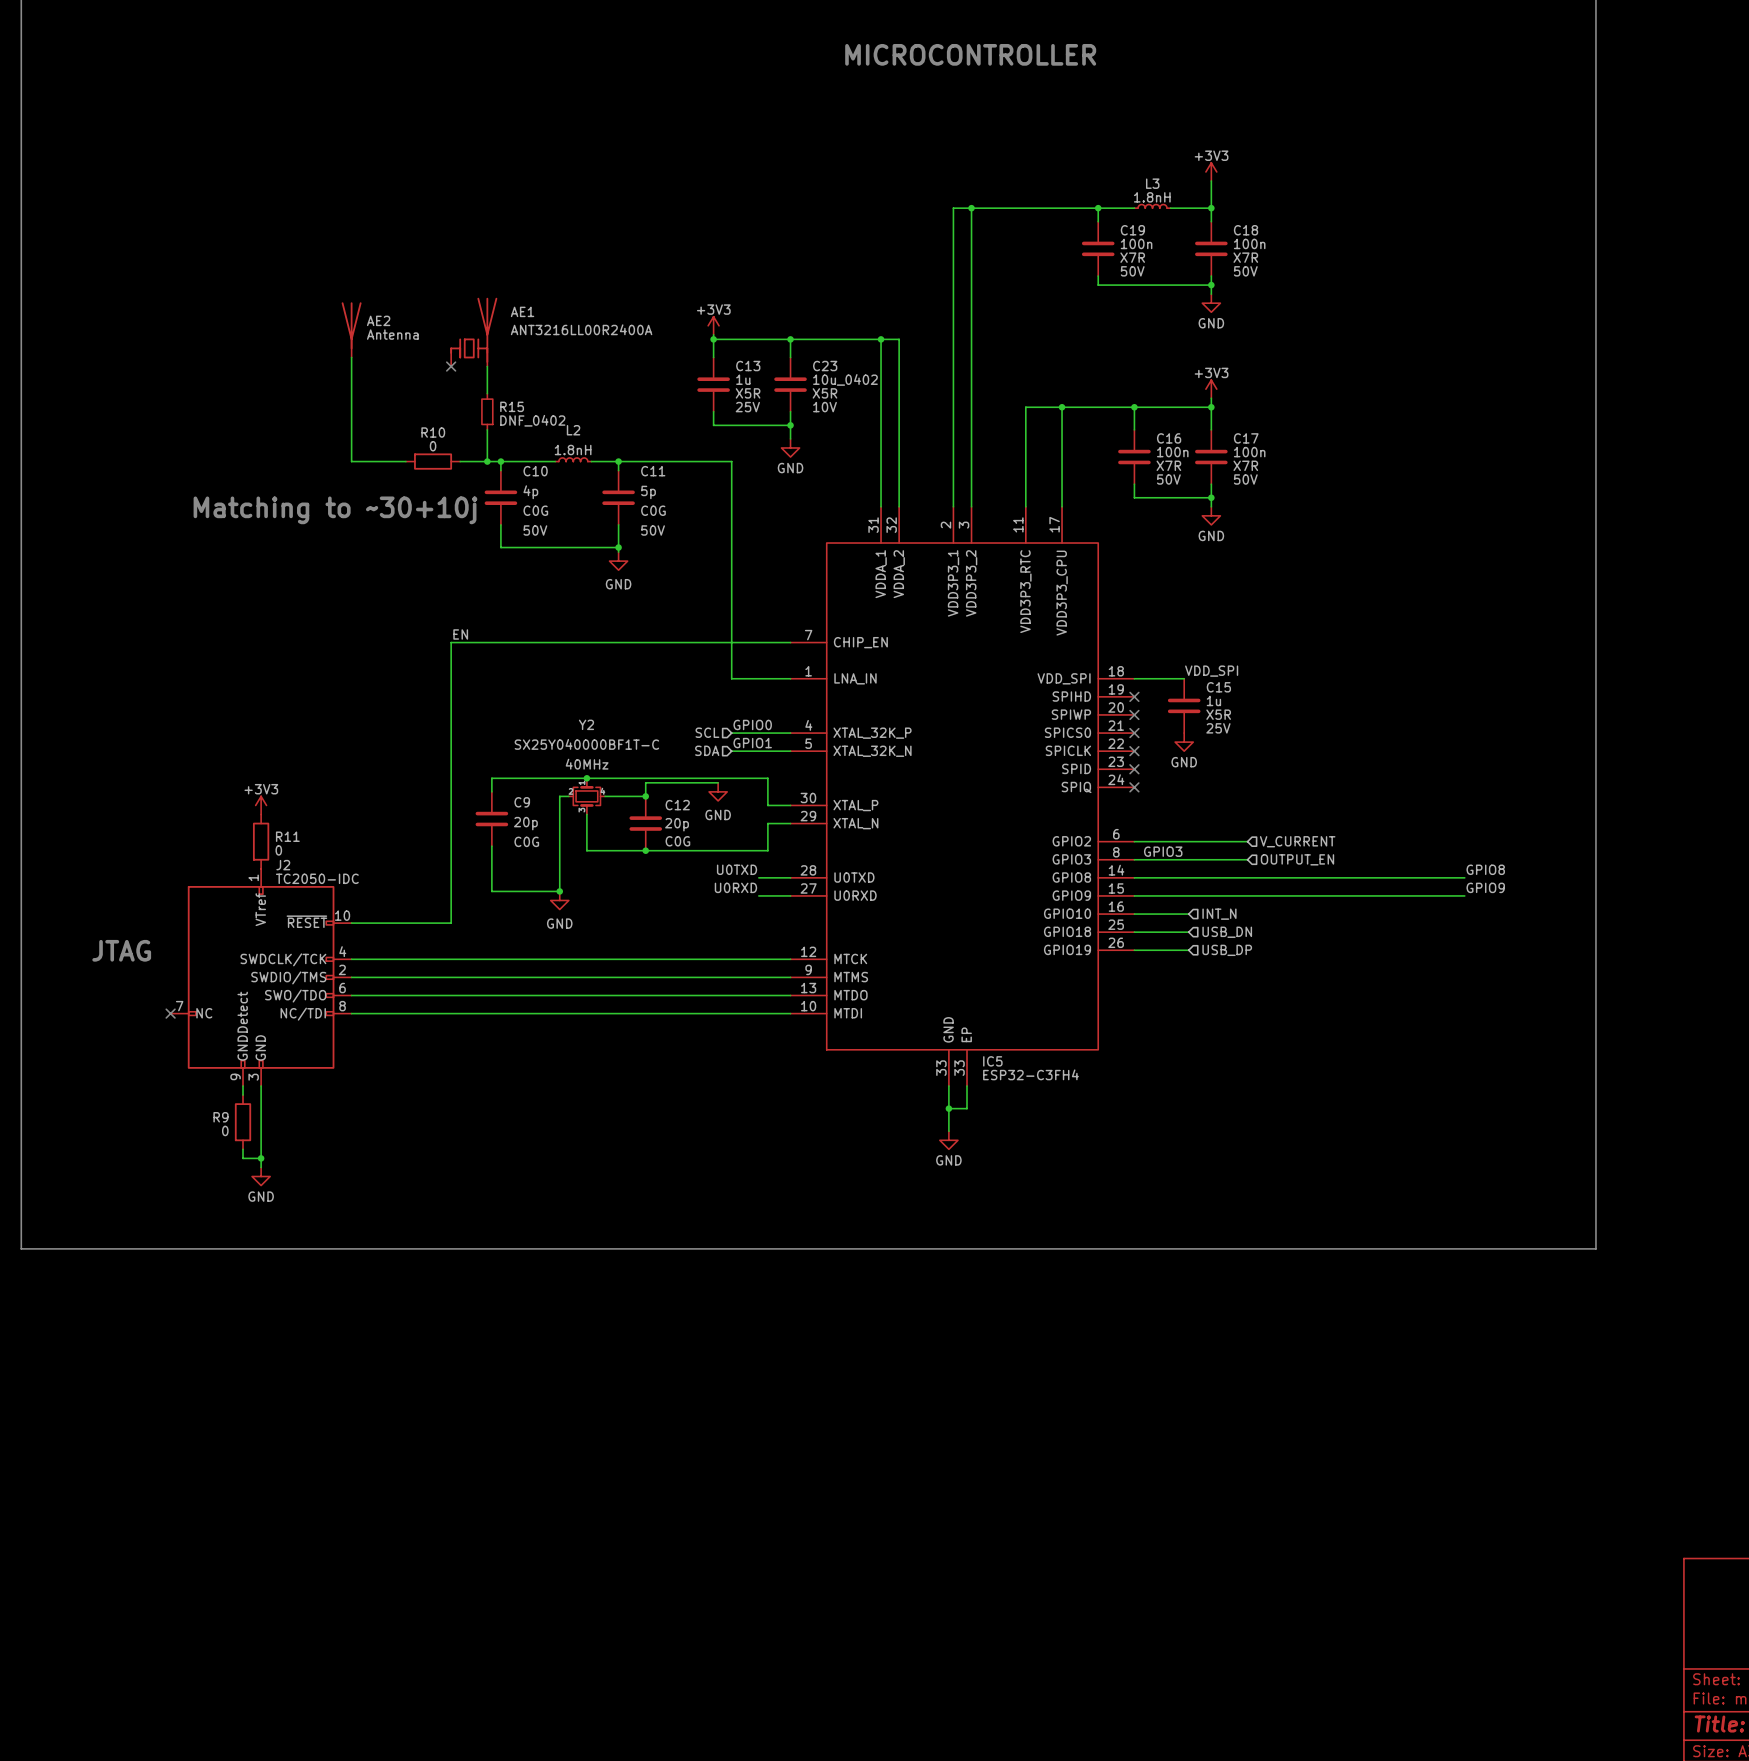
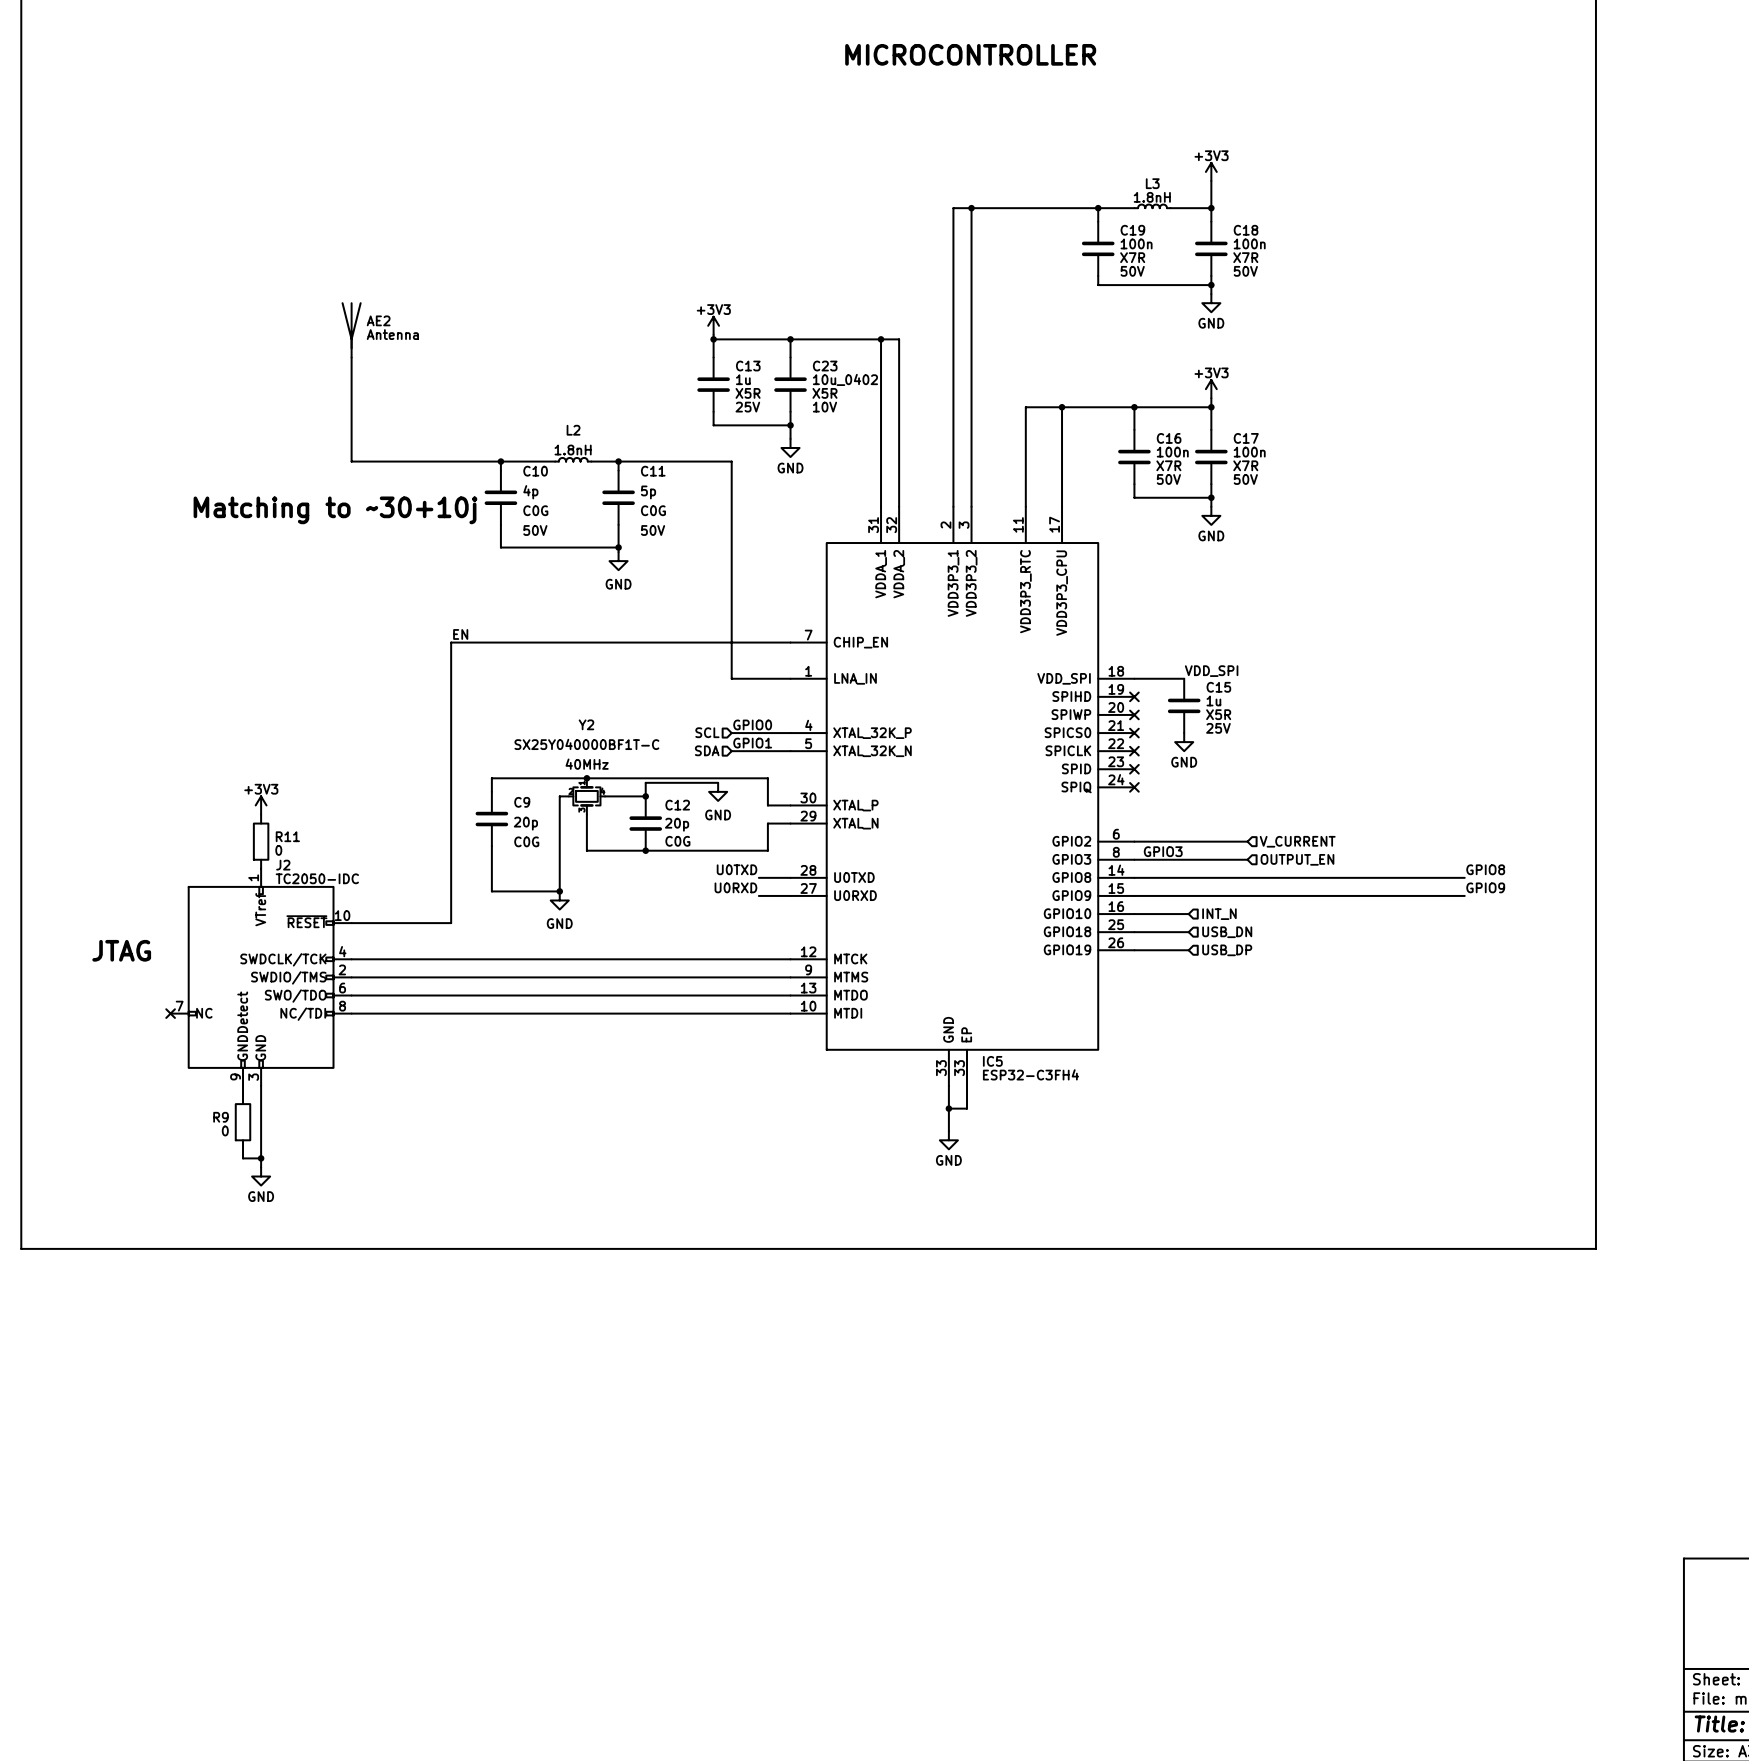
AE1: ANT3216LL00R2400A (473, 332) -> none
no-connect mark: (451, 366) -> none
wire: (487, 366) (487, 393) -> none
R15: DNF_0402 (487, 411) -> none
wire: (487, 429) (487, 461) -> none
wire: none -> (405, 461) (460, 461)
R10: 0 (433, 461) -> none
junction: (487, 461) -> none

